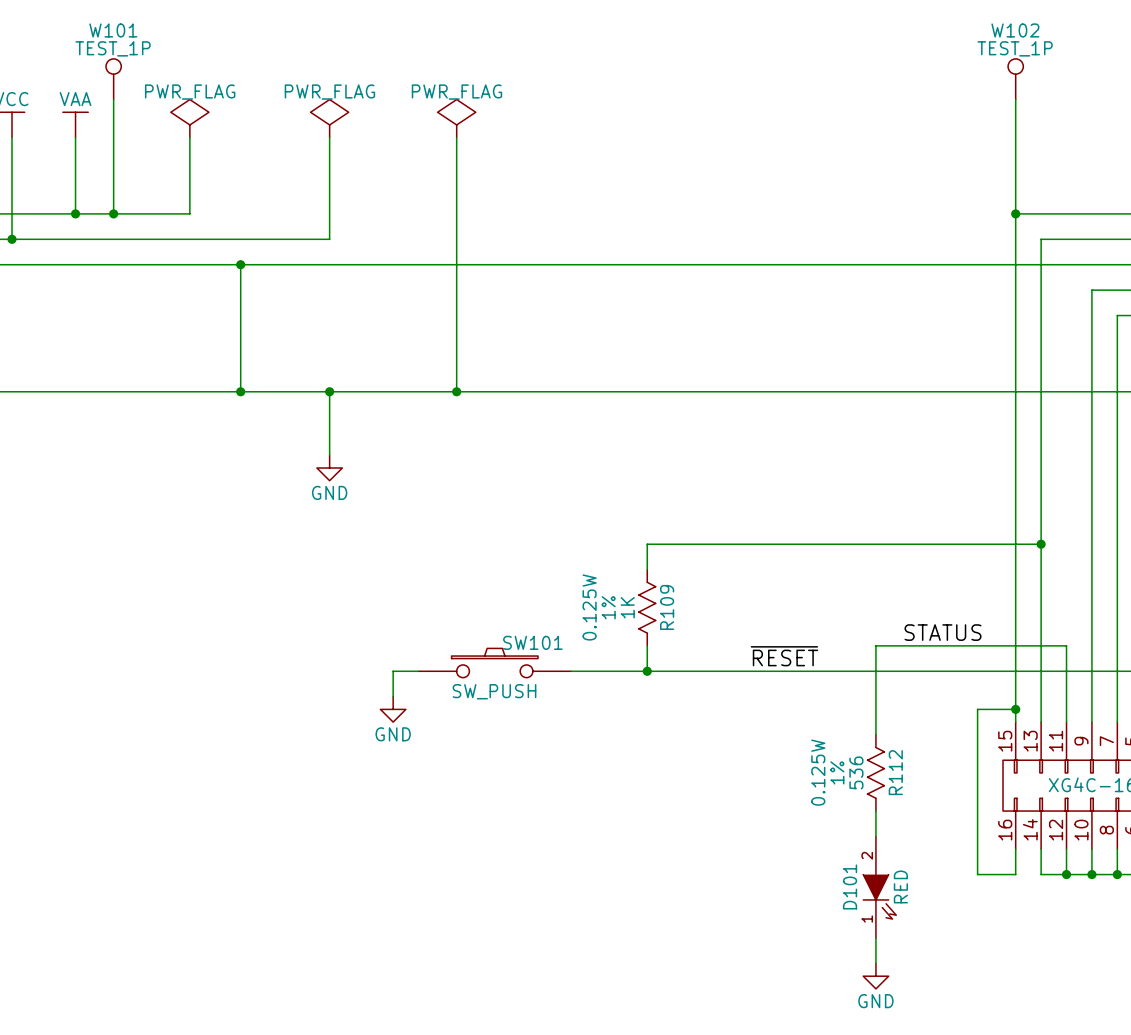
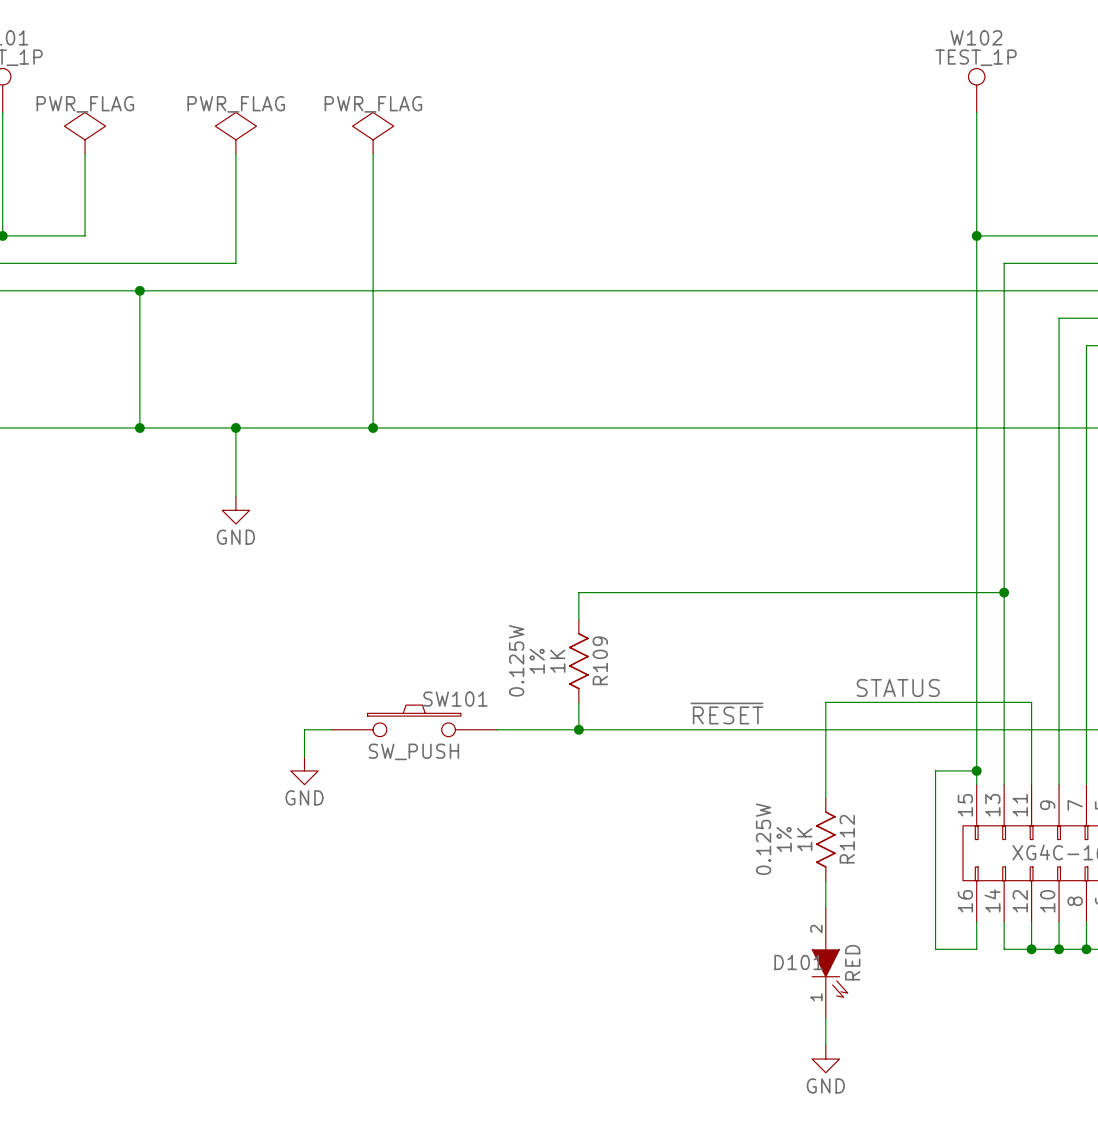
R112 value: 536 (856, 772) -> 1K (804, 839)
D101 name rotation: 0° (850, 886) -> 90° clockwise (798, 962)

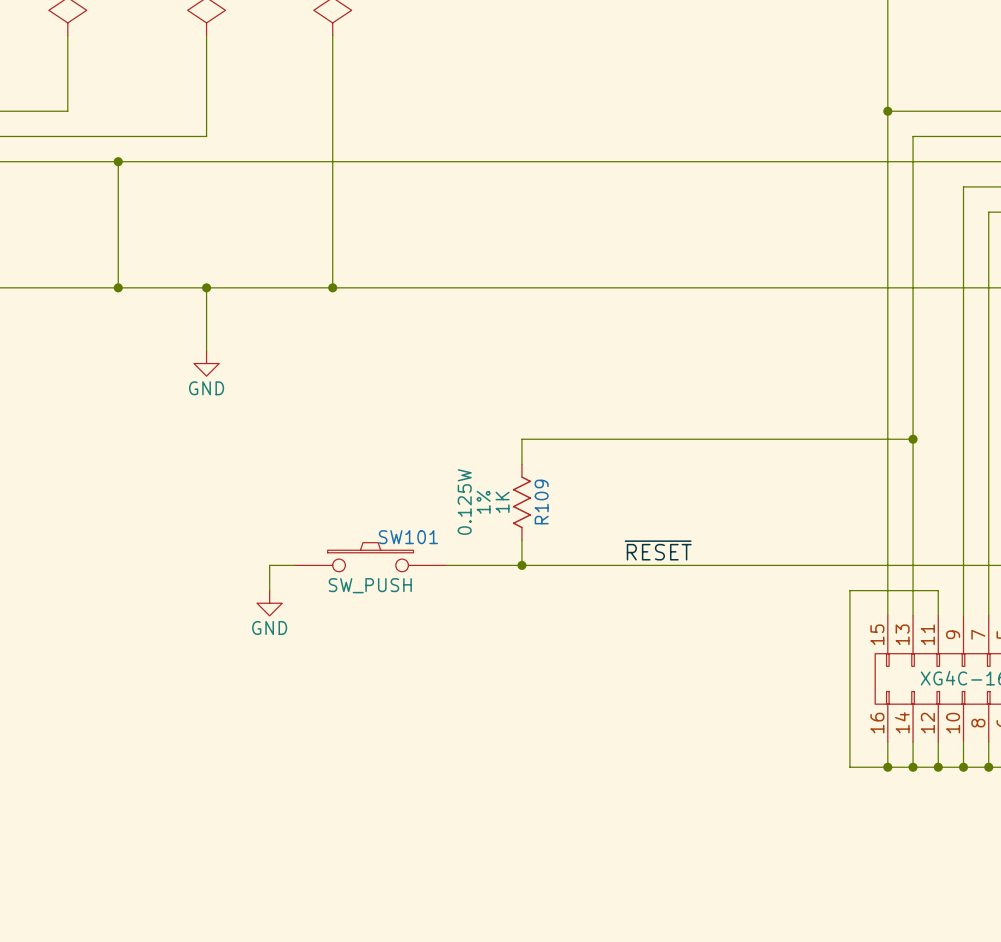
label: STATUS (898, 687) -> none
wire: (1031, 757) (1031, 702) (825, 702) (825, 798) -> none
wire: (935, 770) (976, 770) -> (849, 603) (849, 590) (938, 590)
junction: (976, 770) -> none
R112: 1K (825, 839) -> none
wire: (825, 880) (825, 908) -> none
wire: none -> (887, 767) (913, 767)
junction: none -> (887, 767)
junction: none -> (913, 767)
D101: RED (829, 963) -> none
wire: (825, 1017) (825, 1045) -> none
power symbol: GND (825, 1059) -> none

